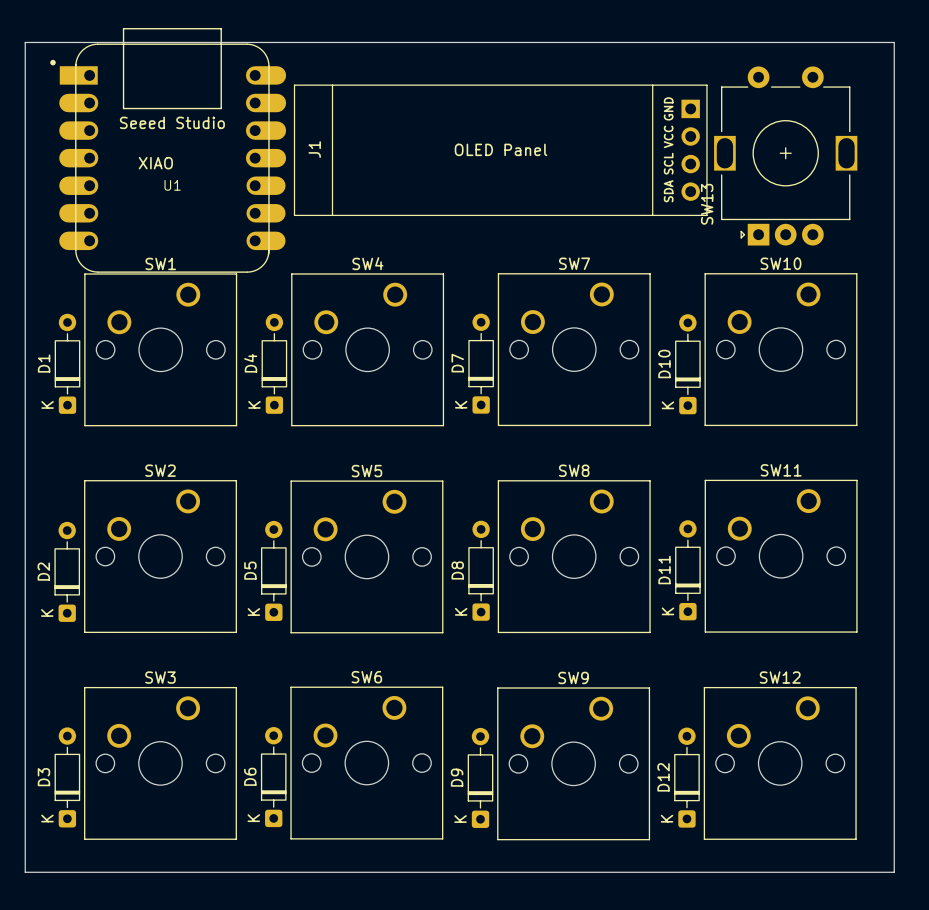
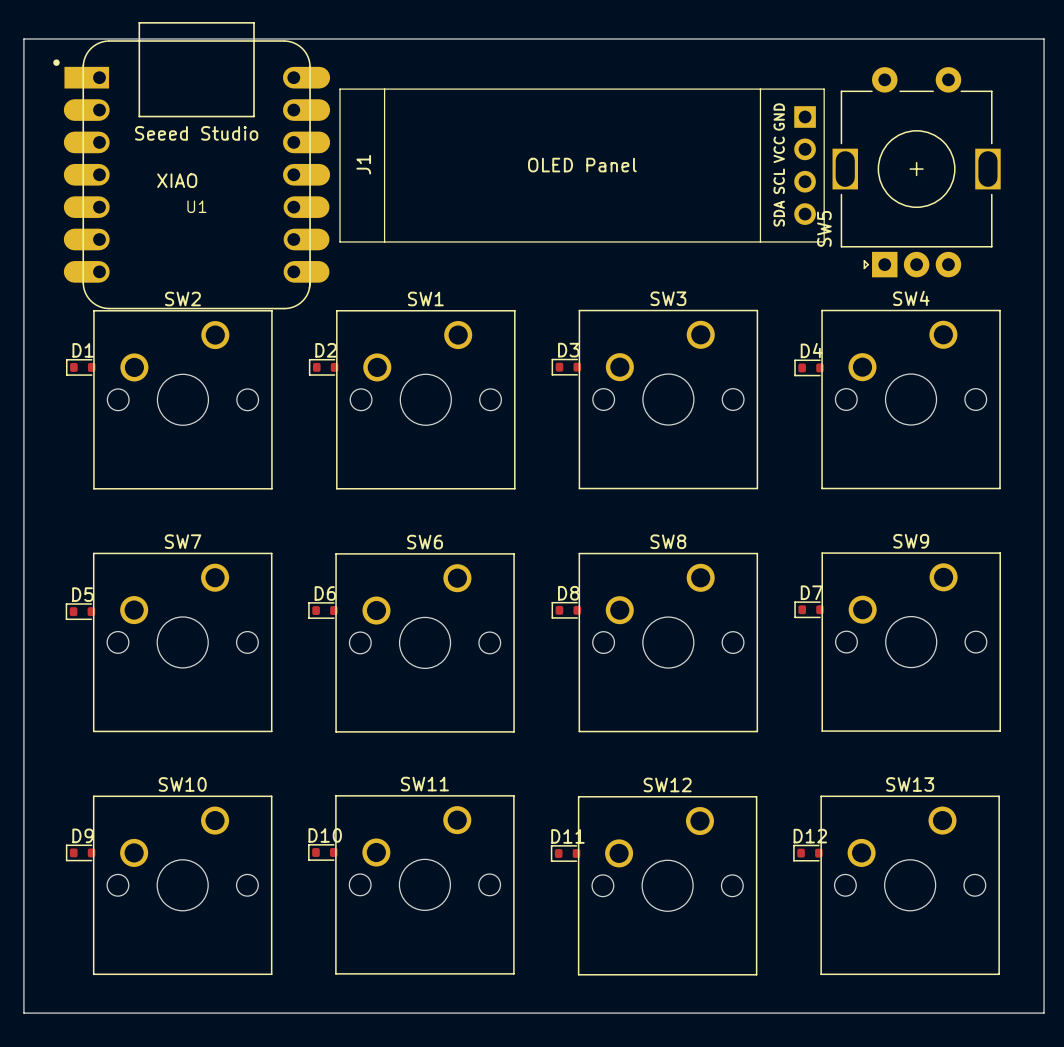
SW13 name: SW13 (707, 204) -> SW5 (824, 228)
SW1 name: SW1 (160, 263) -> SW2 (182, 298)
SW4 name: SW4 (367, 263) -> SW1 (425, 298)
SW7 name: SW7 (574, 263) -> SW3 (668, 298)
SW10 name: SW10 (780, 263) -> SW4 (911, 298)
D1 footprint: [54, 313, 81, 414] -> [66, 359, 96, 376]
D4 footprint: [261, 313, 288, 414] -> [794, 359, 824, 377]
D7 footprint: [468, 313, 494, 414] -> [794, 601, 824, 619]
D10 footprint: [675, 314, 701, 415] -> [308, 844, 338, 861]
D1 name position: D1 (44, 363) -> D1 (83, 350)
D4 name position: D4 (250, 363) -> D4 (811, 350)
D7 name position: D7 (457, 363) -> D7 (811, 592)
D10 name position: D10 (664, 363) -> D10 (325, 835)
SW2 name: SW2 (160, 470) -> SW7 (183, 541)
SW11 name: SW11 (781, 470) -> SW9 (911, 541)
SW5 name: SW5 (366, 471) -> SW6 (425, 542)
D5 footprint: [261, 520, 287, 621] -> [65, 603, 96, 621]
D8 footprint: [468, 520, 494, 621] -> [551, 601, 582, 619]
D11 footprint: [675, 520, 701, 621] -> [550, 845, 581, 862]
D2 footprint: [54, 521, 81, 622] -> [308, 358, 339, 376]
D5 name position: D5 (250, 570) -> D5 (82, 594)
D8 name position: D8 (457, 570) -> D8 (568, 593)
D11 name position: D11 (664, 570) -> D11 (567, 836)
D2 name position: D2 (43, 571) -> D2 (325, 350)
SW3 name: SW3 (160, 677) -> SW10 (182, 784)
SW6 name: SW6 (366, 677) -> SW11 (424, 784)
SW9 name: SW9 (573, 677) -> SW12 (667, 784)
SW12 name: SW12 (780, 677) -> SW13 (910, 784)
D3 footprint: [54, 727, 81, 828] -> [551, 358, 582, 376]
D6 footprint: [260, 727, 287, 828] -> [308, 602, 338, 619]
D9 footprint: [467, 727, 494, 828] -> [65, 844, 96, 862]
D12 footprint: [674, 727, 700, 828] -> [793, 844, 823, 862]
D6 name position: D6 (250, 776) -> D6 (325, 593)
D3 name position: D3 (43, 777) -> D3 (568, 350)
D9 name position: D9 (457, 777) -> D9 (82, 835)
D12 name position: D12 (663, 777) -> D12 (810, 836)

